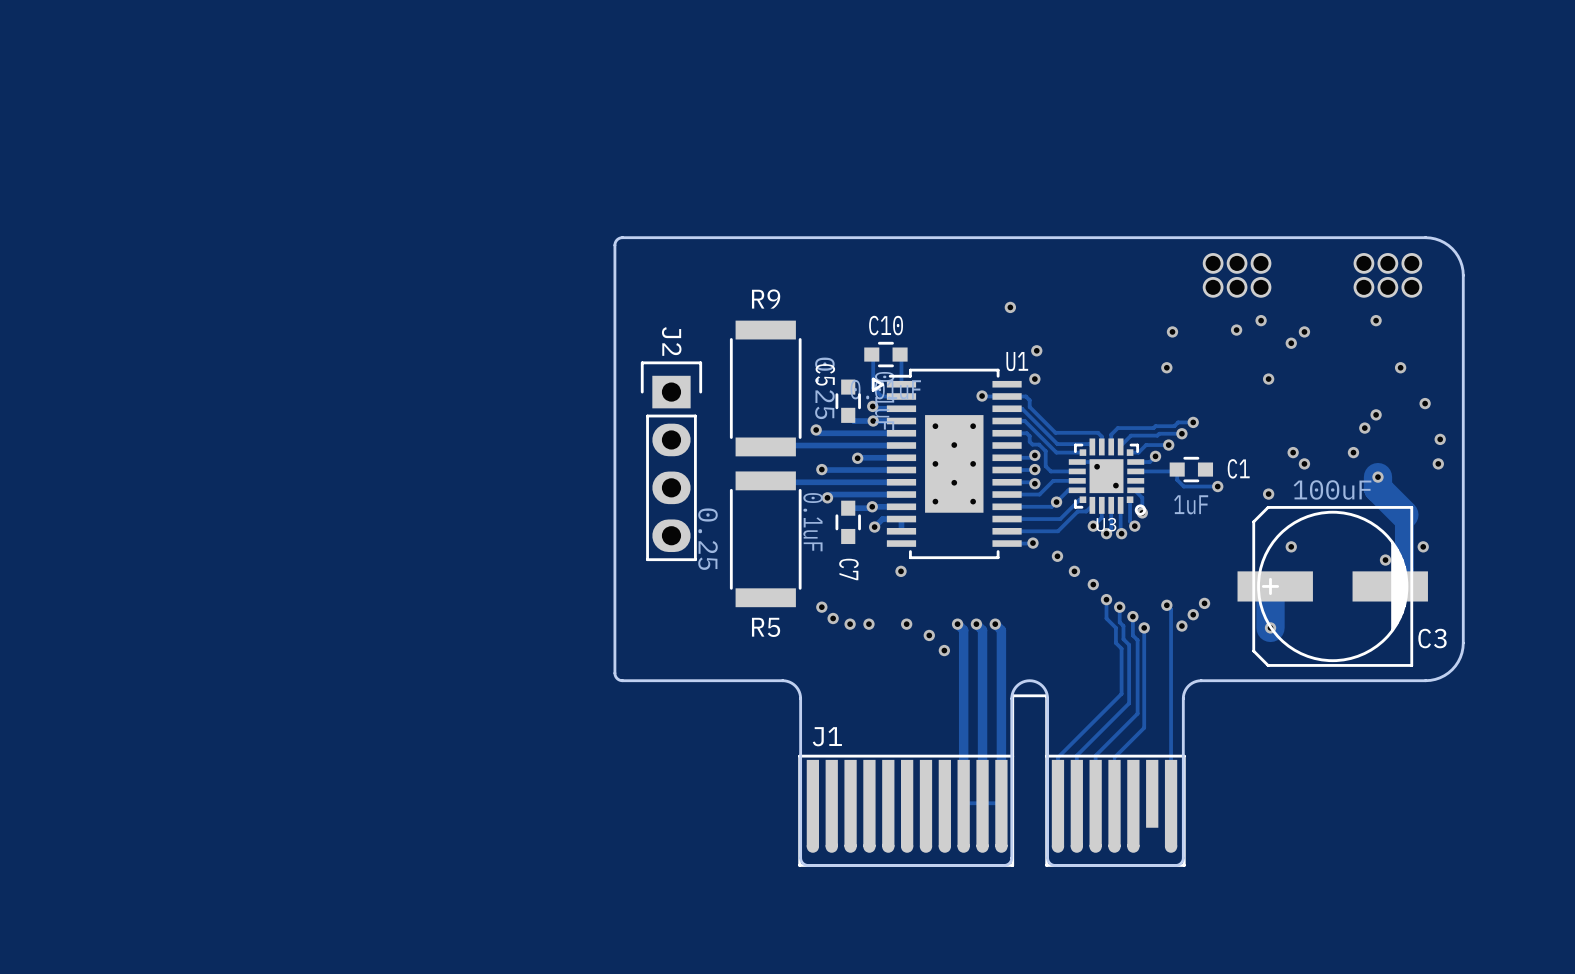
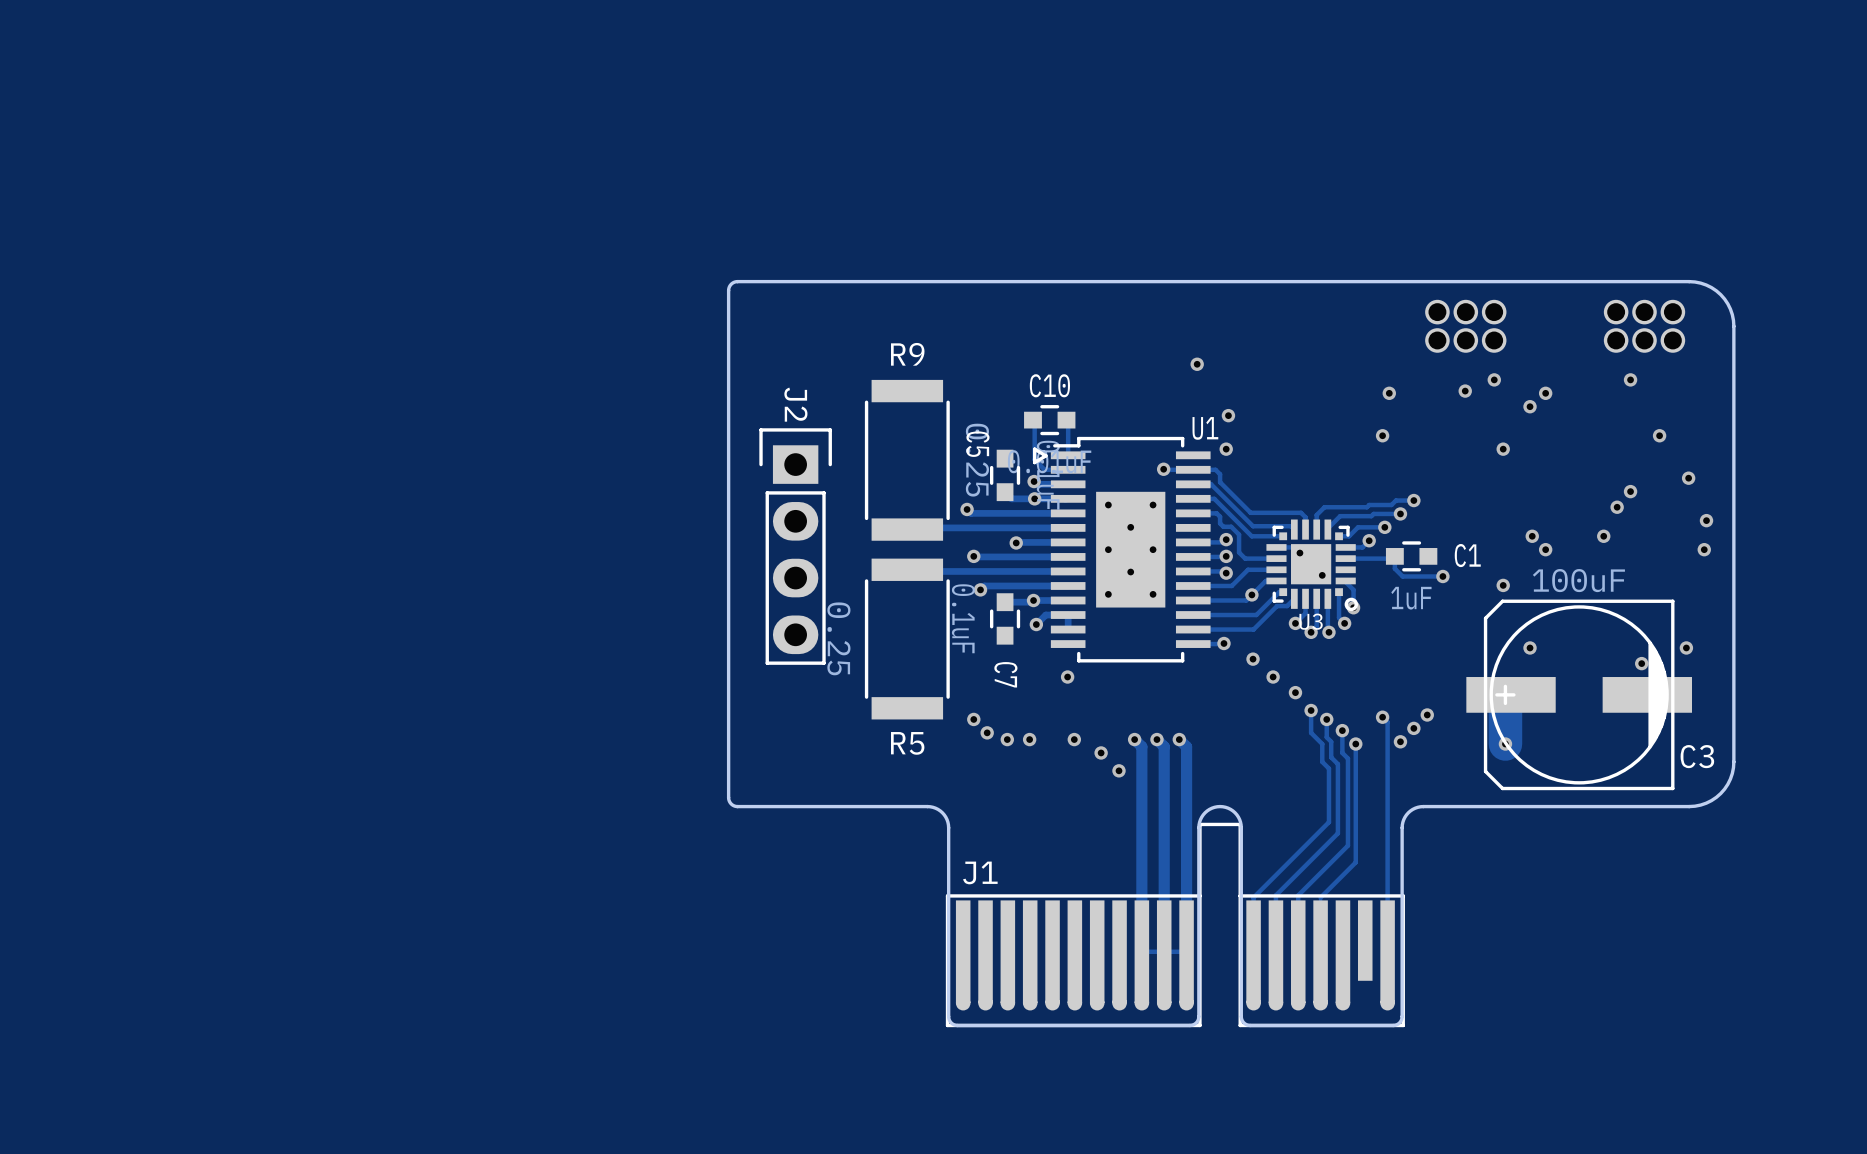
track: (1377, 477) (1377, 488) (1404, 514) (1404, 571) (1390, 586) -> none
via: (1377, 477) -> none

